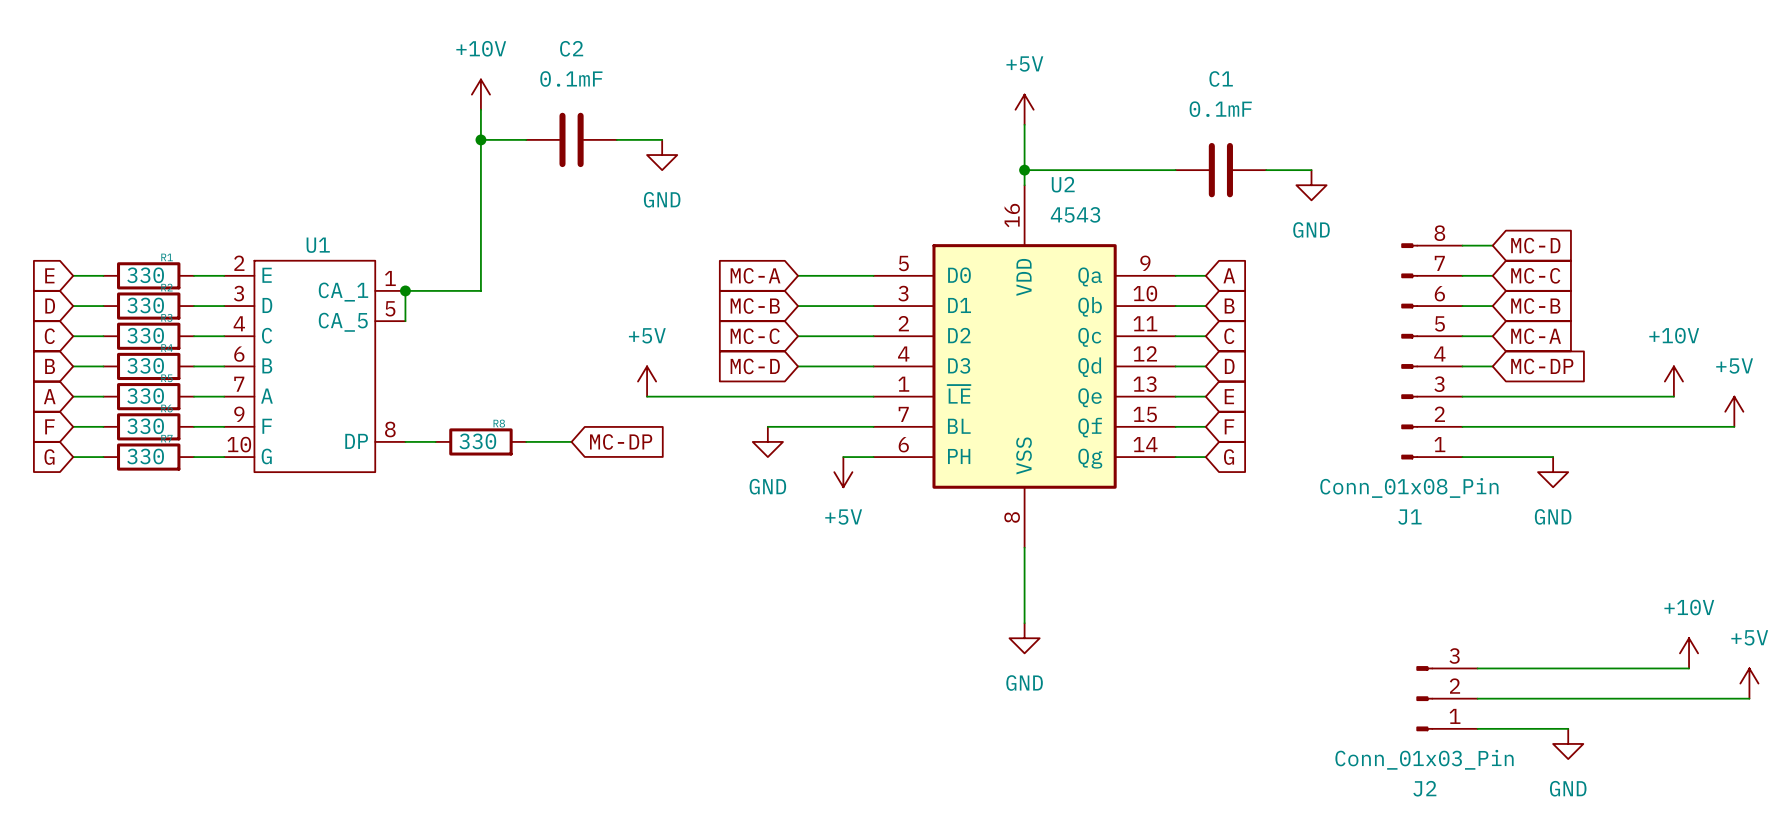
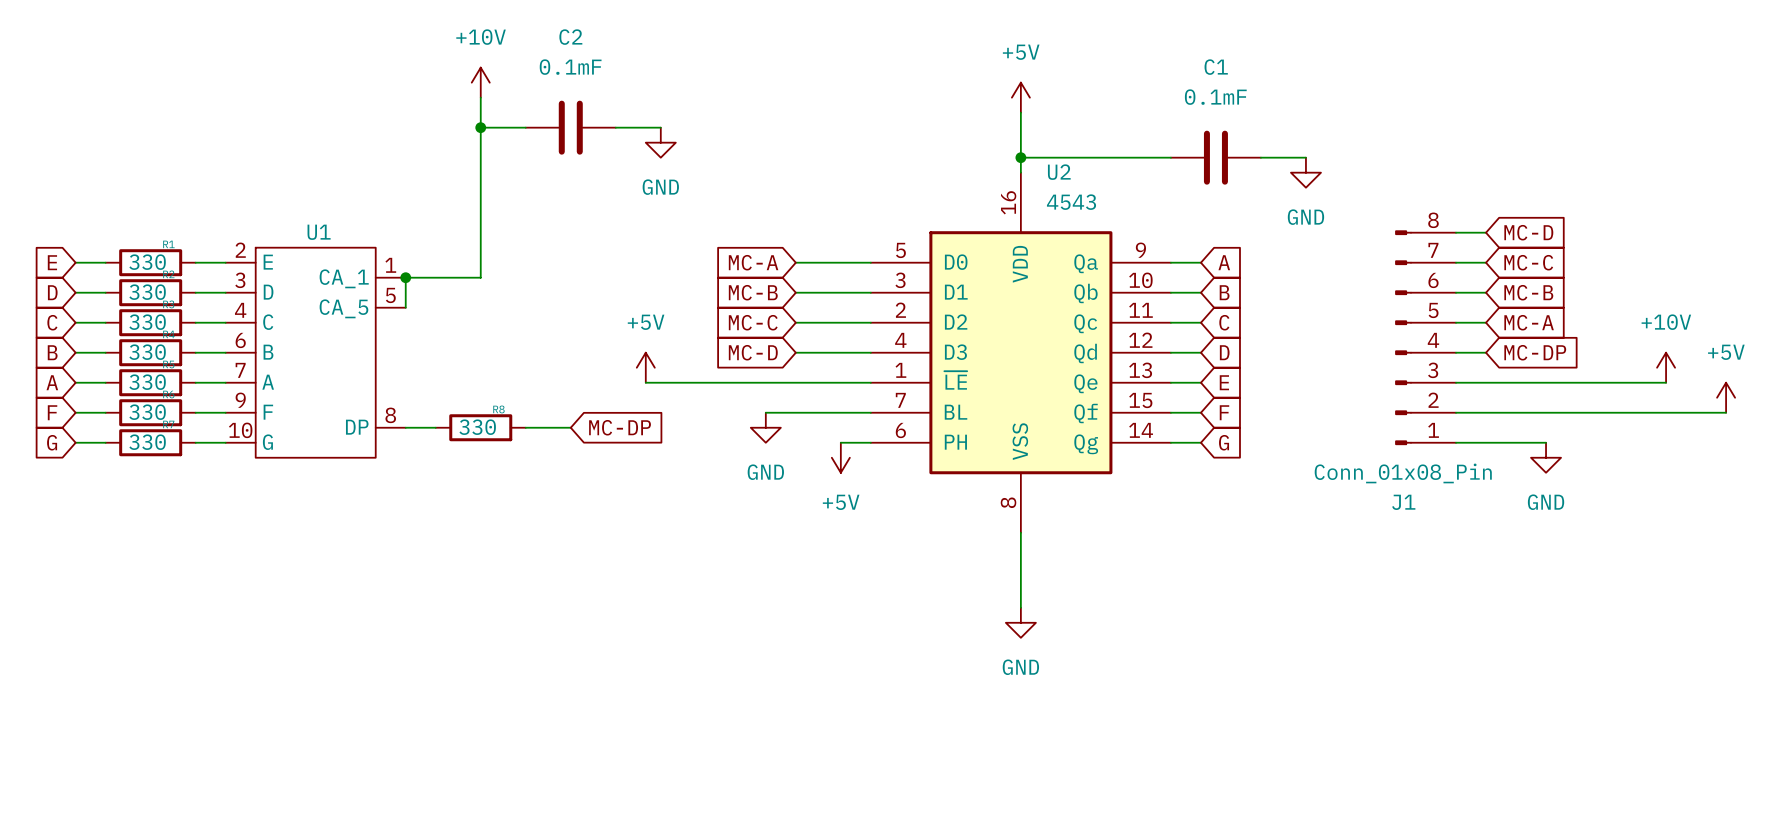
power symbol: +10V (1689, 653) -> none
wire: (1477, 668) (1689, 668) -> none
power symbol: +5V (1749, 683) -> none
J2: Conn_01x03_Pin (1446, 698) -> none
wire: (1477, 698) (1749, 698) -> none
wire: (1477, 728) (1568, 728) -> none
power symbol: GND (1568, 743) -> none

